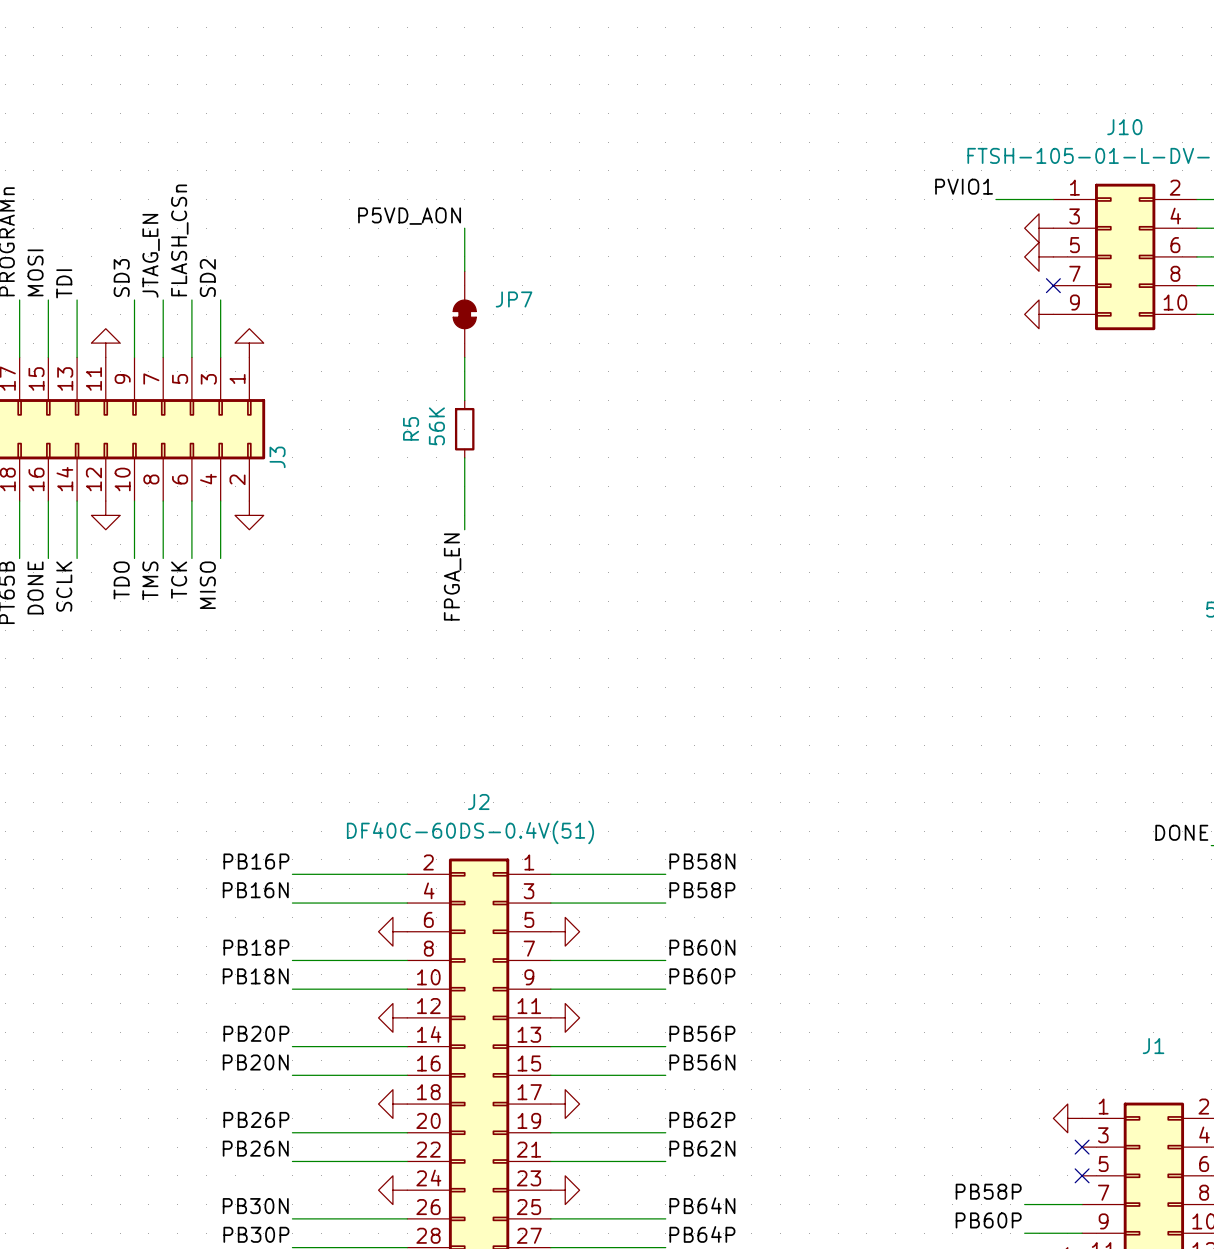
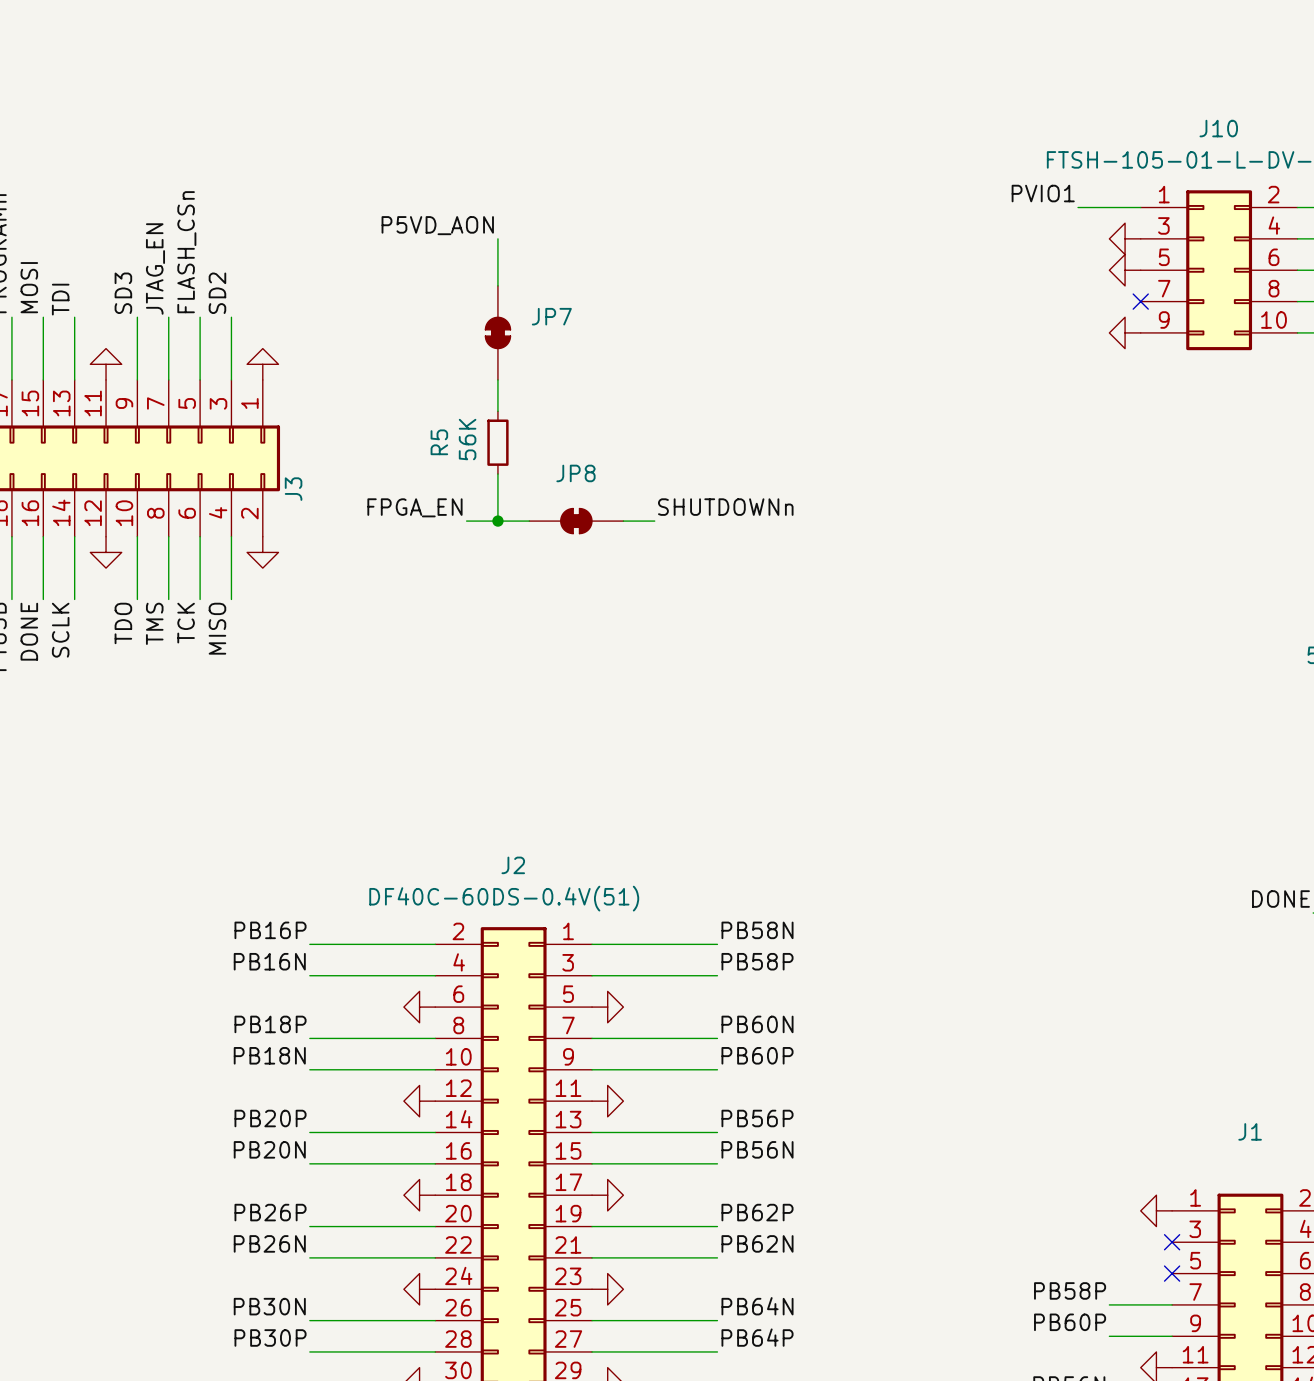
R5 position: (464, 429) -> (497, 442)
label: none -> SHUTDOWNn (725, 507)
wire: none -> (466, 521) (529, 521)
wire: (464, 486) (464, 529) -> none
junction: none -> (497, 521)
JP8: none -> (576, 521)
wire: none -> (623, 521) (654, 521)
label rotation: 0° (452, 577) -> 90° clockwise (414, 507)
label position: FPGA_EN (452, 577) -> FPGA_EN (414, 507)

